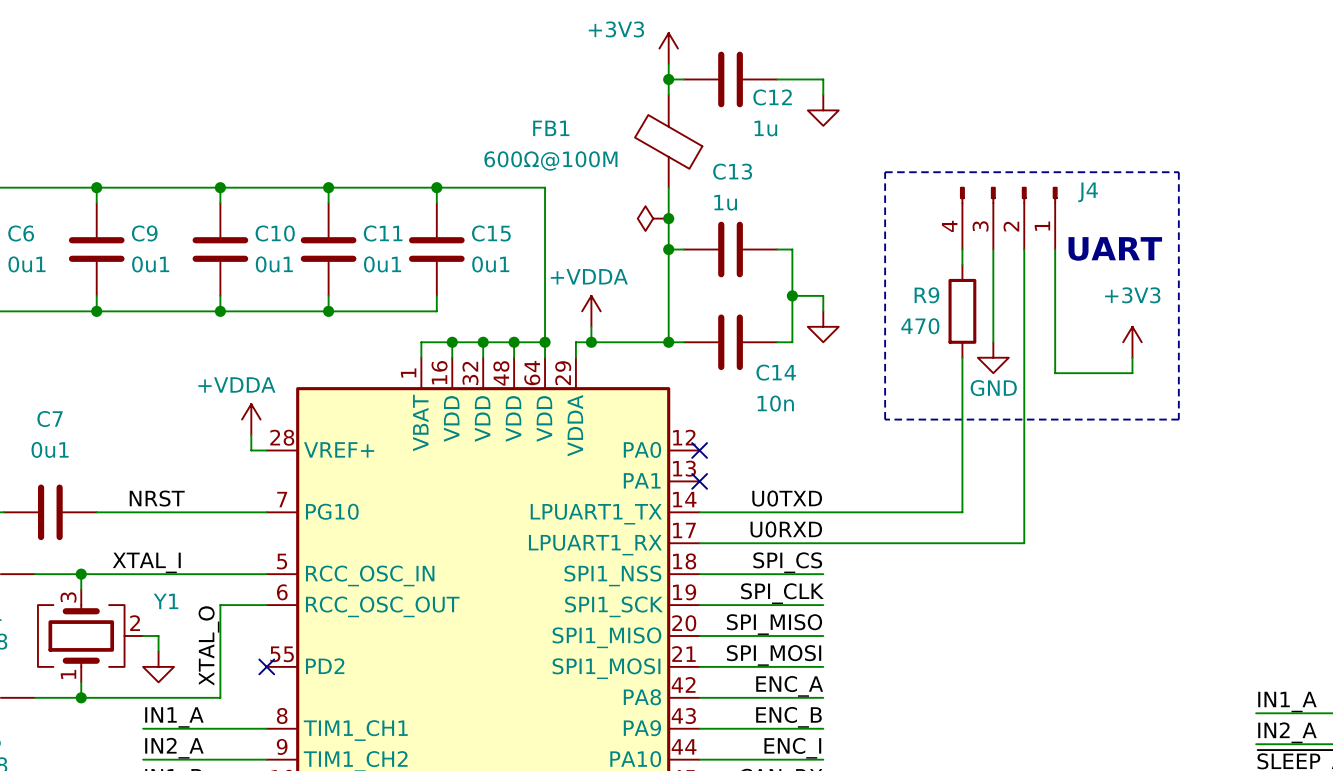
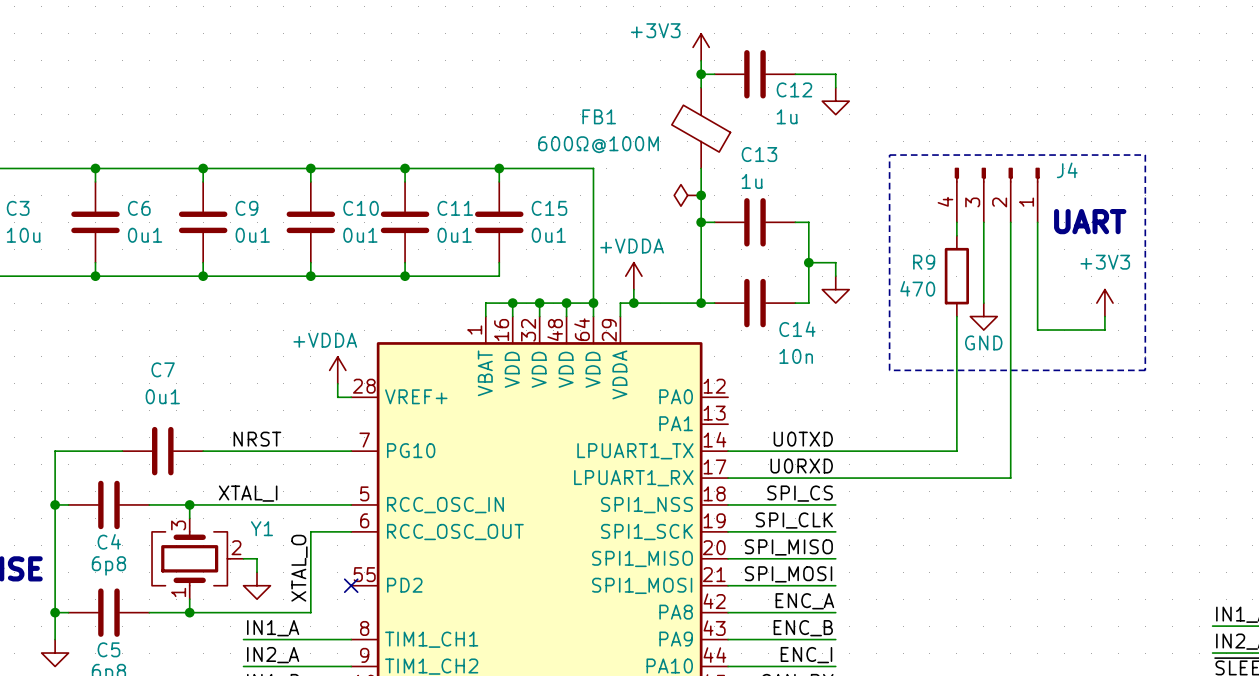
no-connect mark: (699, 450) -> none
no-connect mark: (699, 481) -> none

